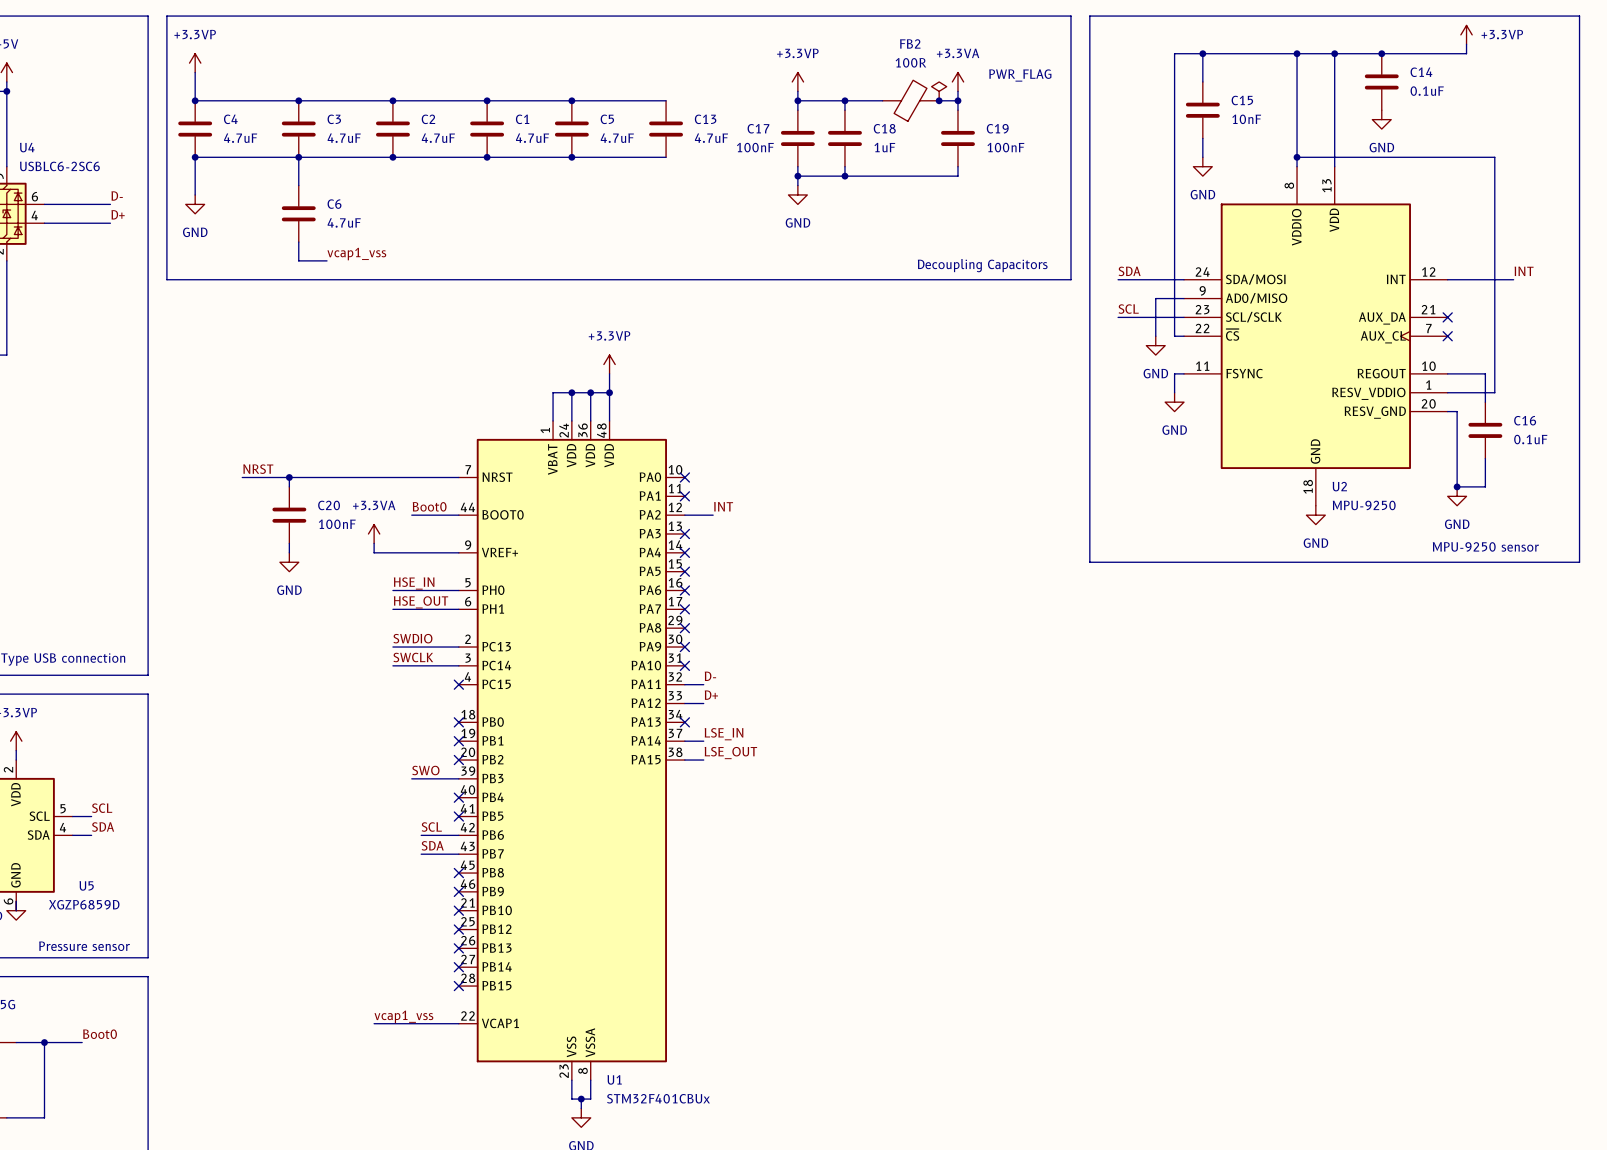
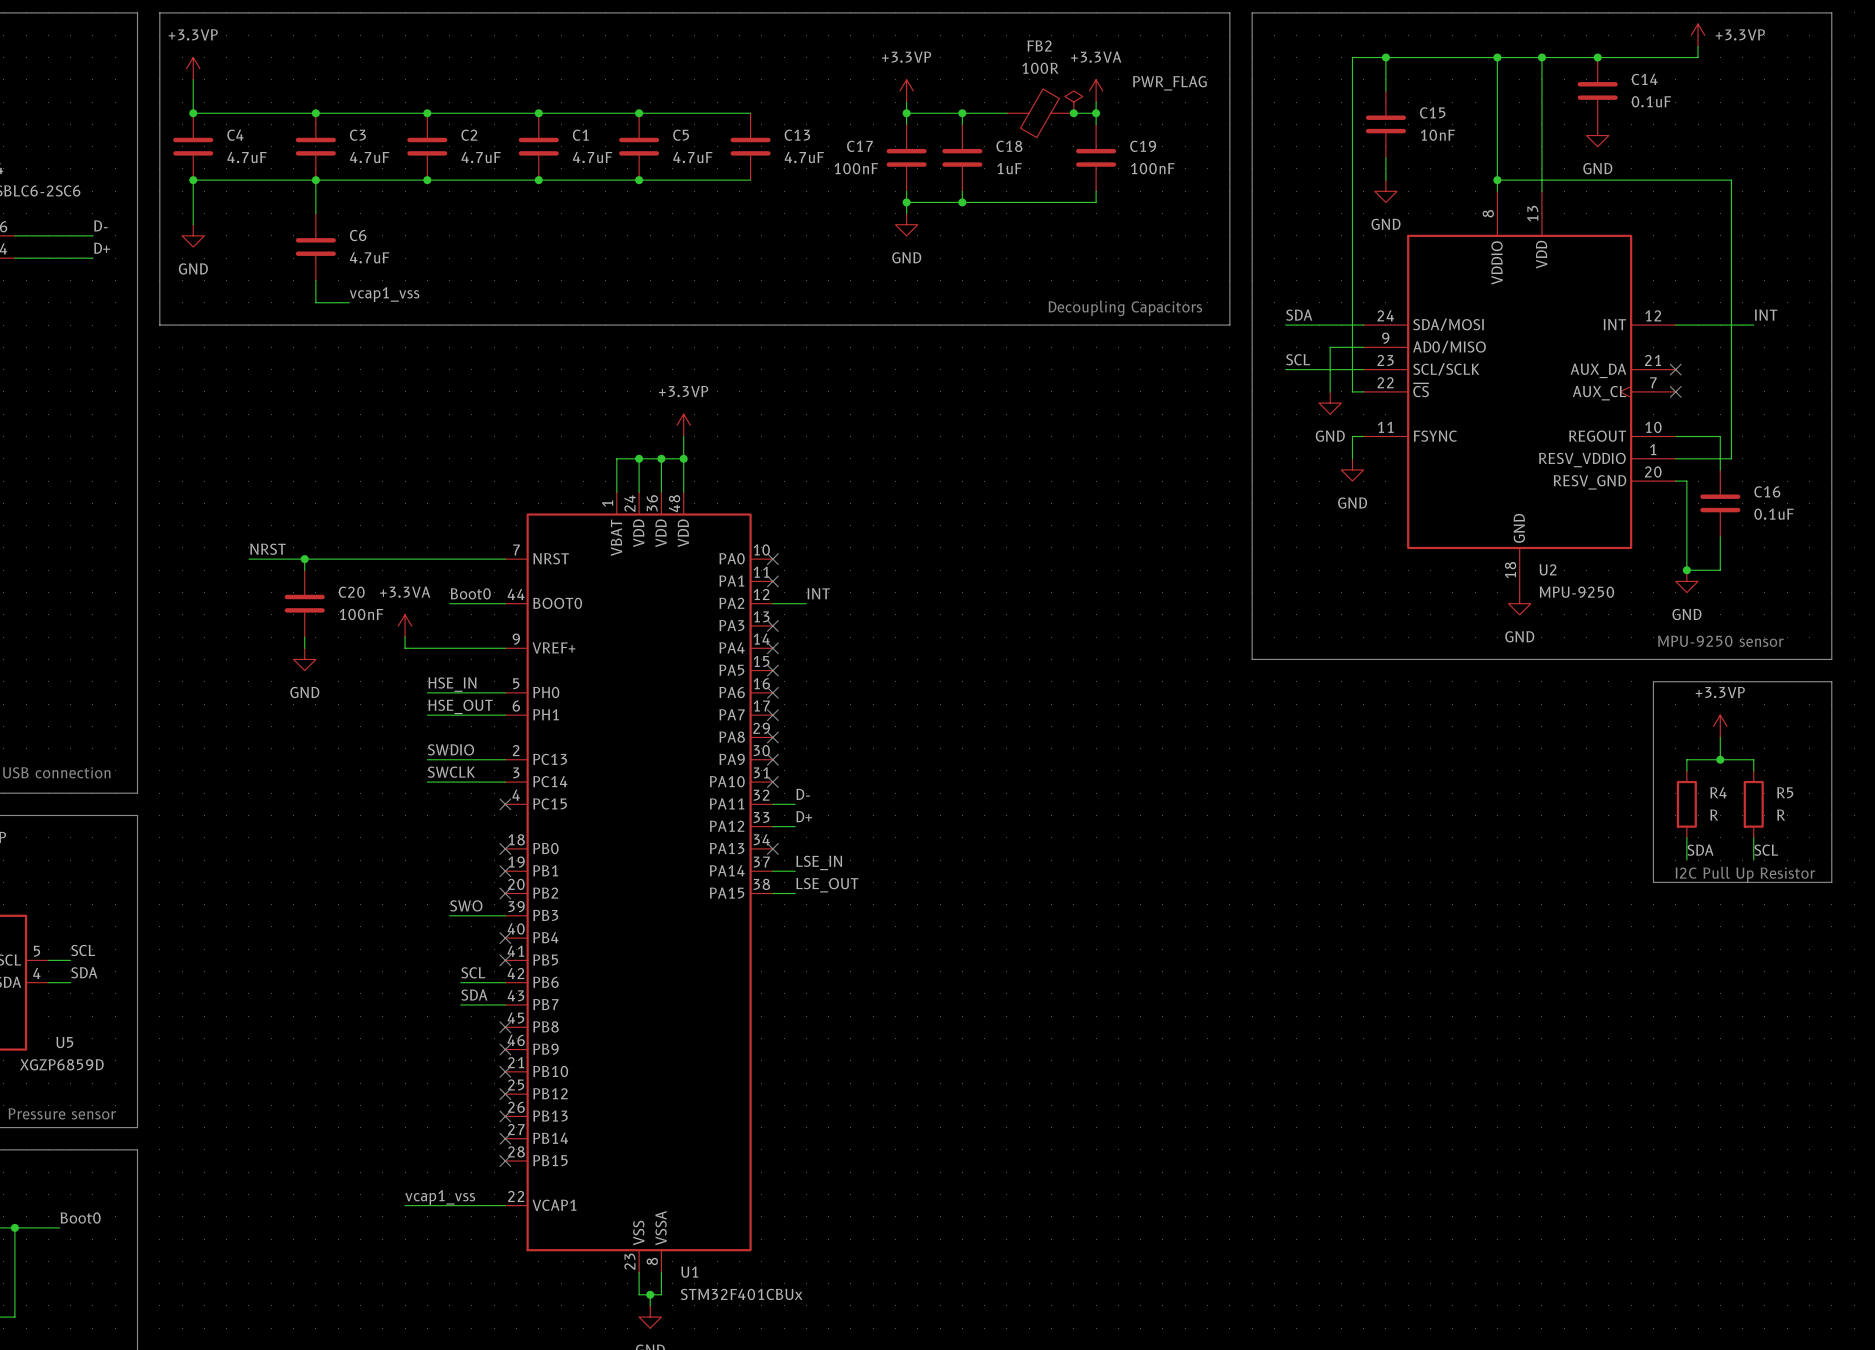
line: none -> (1653, 681) (1831, 681) (1831, 882) (1653, 882) (1653, 681)
power symbol: none -> +3.3VP (1720, 726)
wire: none -> (1720, 737) (1720, 759)
junction: none -> (1720, 759)
wire: none -> (1686, 770) (1686, 759) (1753, 759) (1753, 770)
R4: none -> R (1686, 804)
R5: none -> R (1753, 804)
wire: none -> (1686, 837) (1686, 860)
wire: none -> (1753, 837) (1753, 860)
label: none -> SDA (1700, 850)
label: none -> SCL (1766, 850)
text: none -> I2C Pull Up Resistor (1745, 874)

